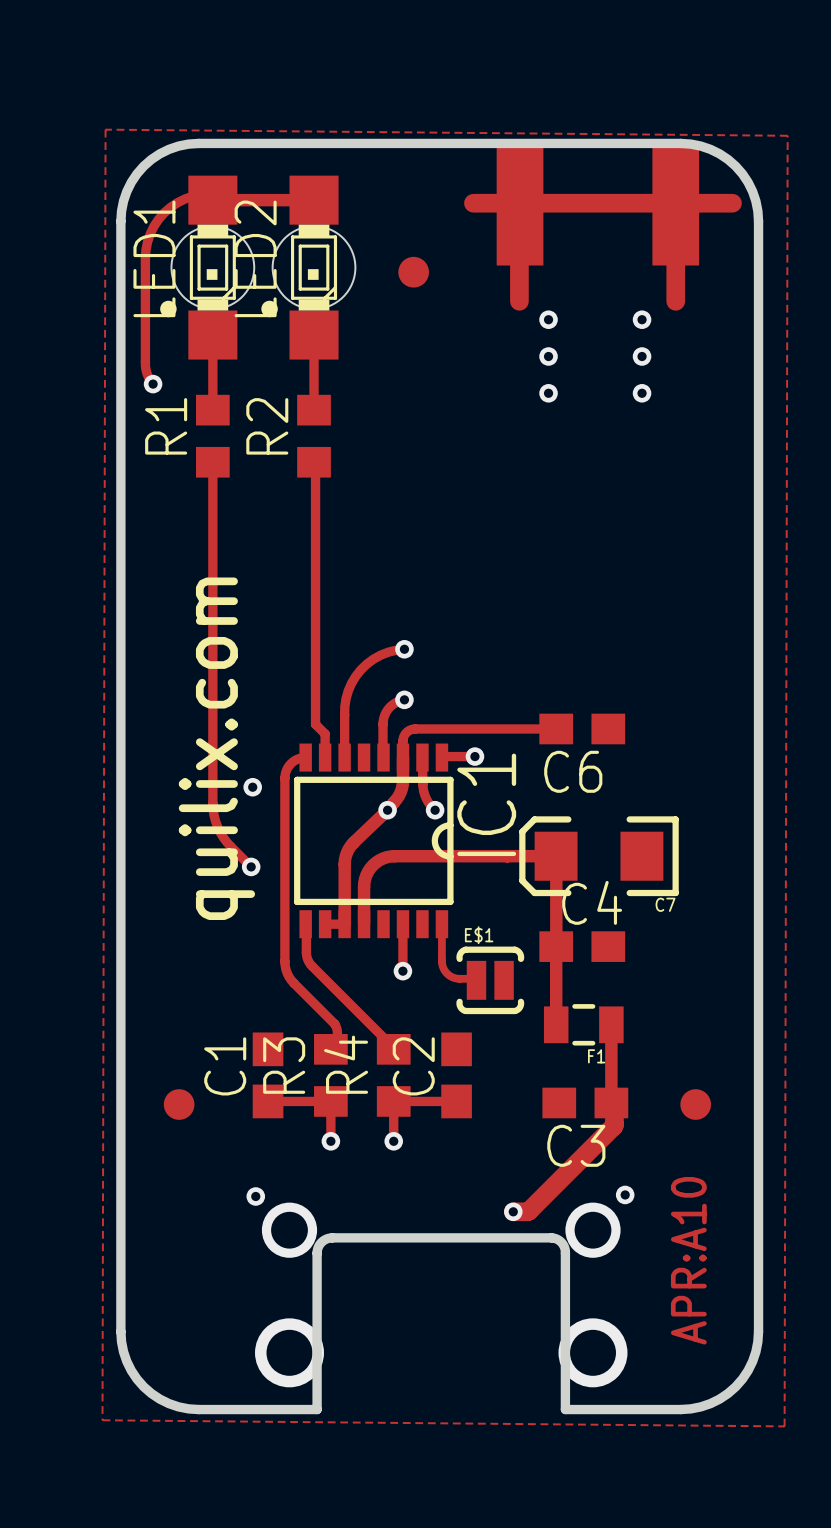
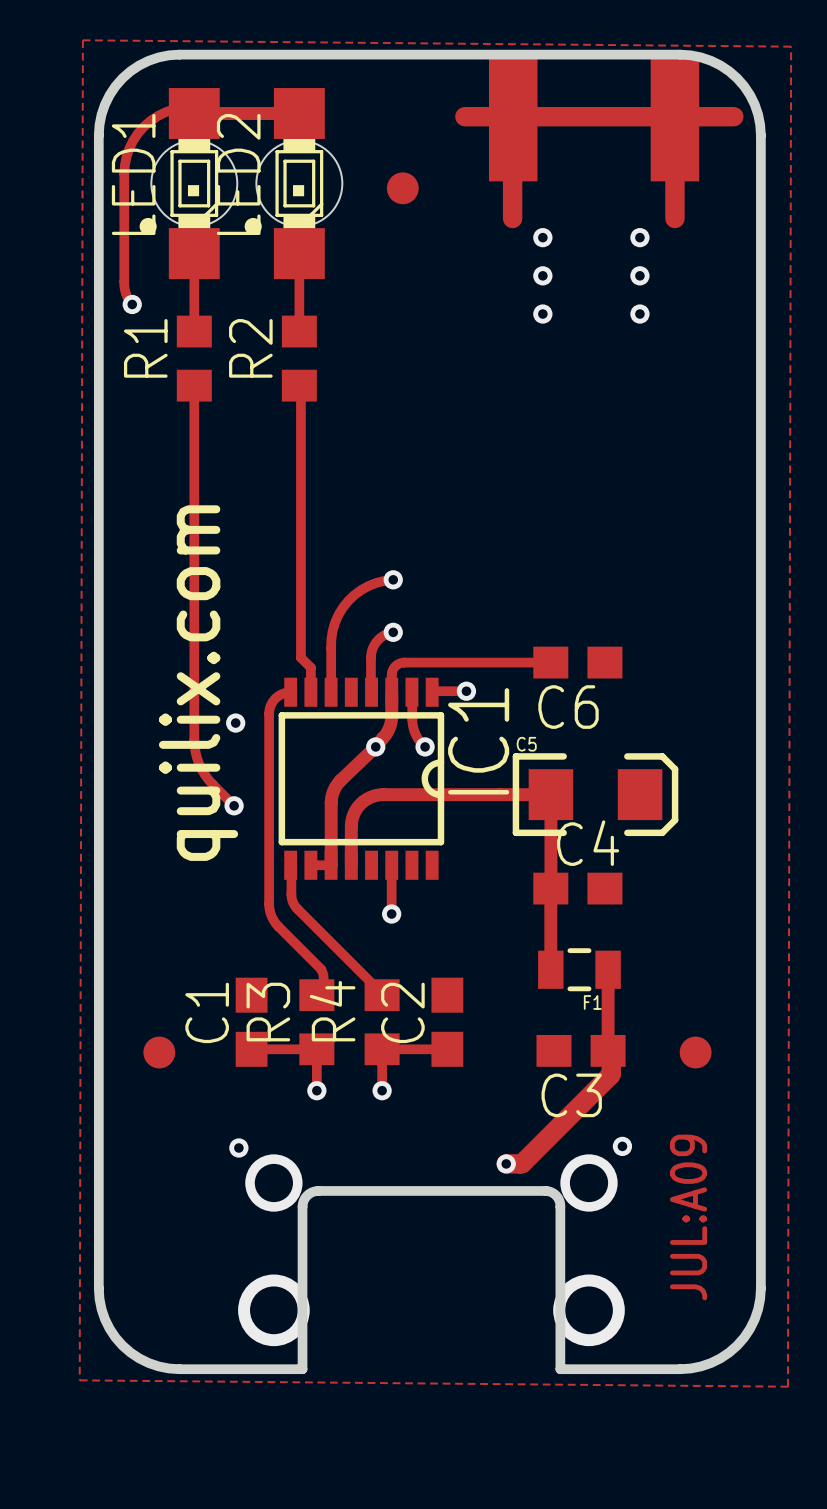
C7: (598, 856) -> none
C5: none -> (595, 794)
track: (441, 924) (441, 961) (444, 969) (455, 978) (476, 980) -> none
E$1: (490, 980) -> none
text: APR:A10 (688, 1260) -> JUL:A09 (688, 1217)

